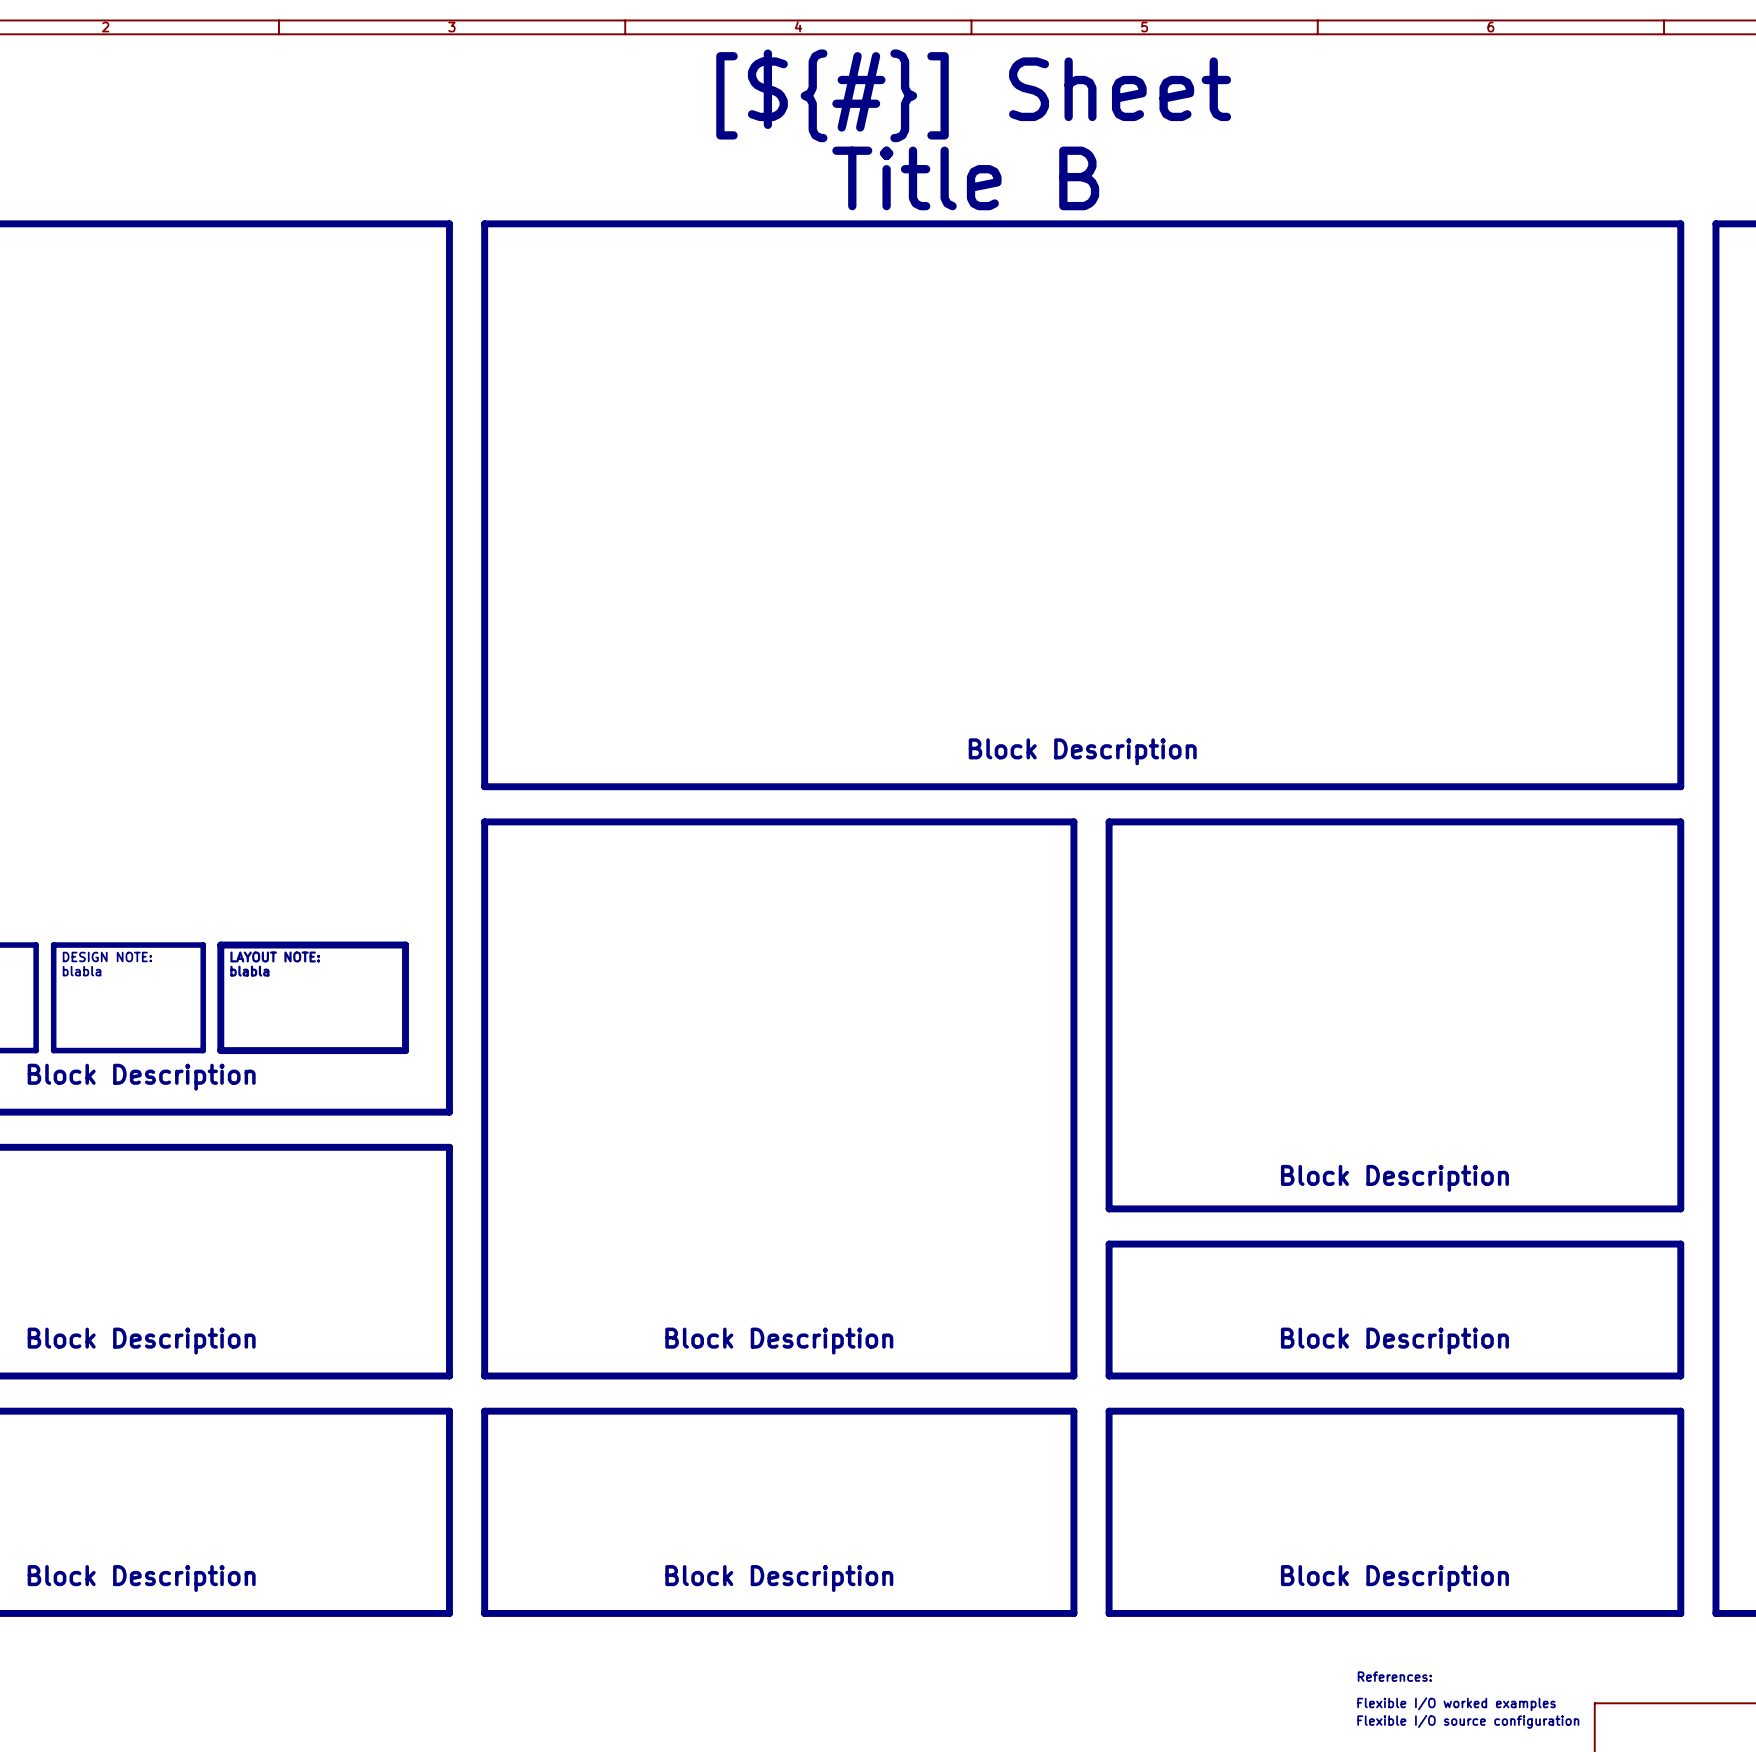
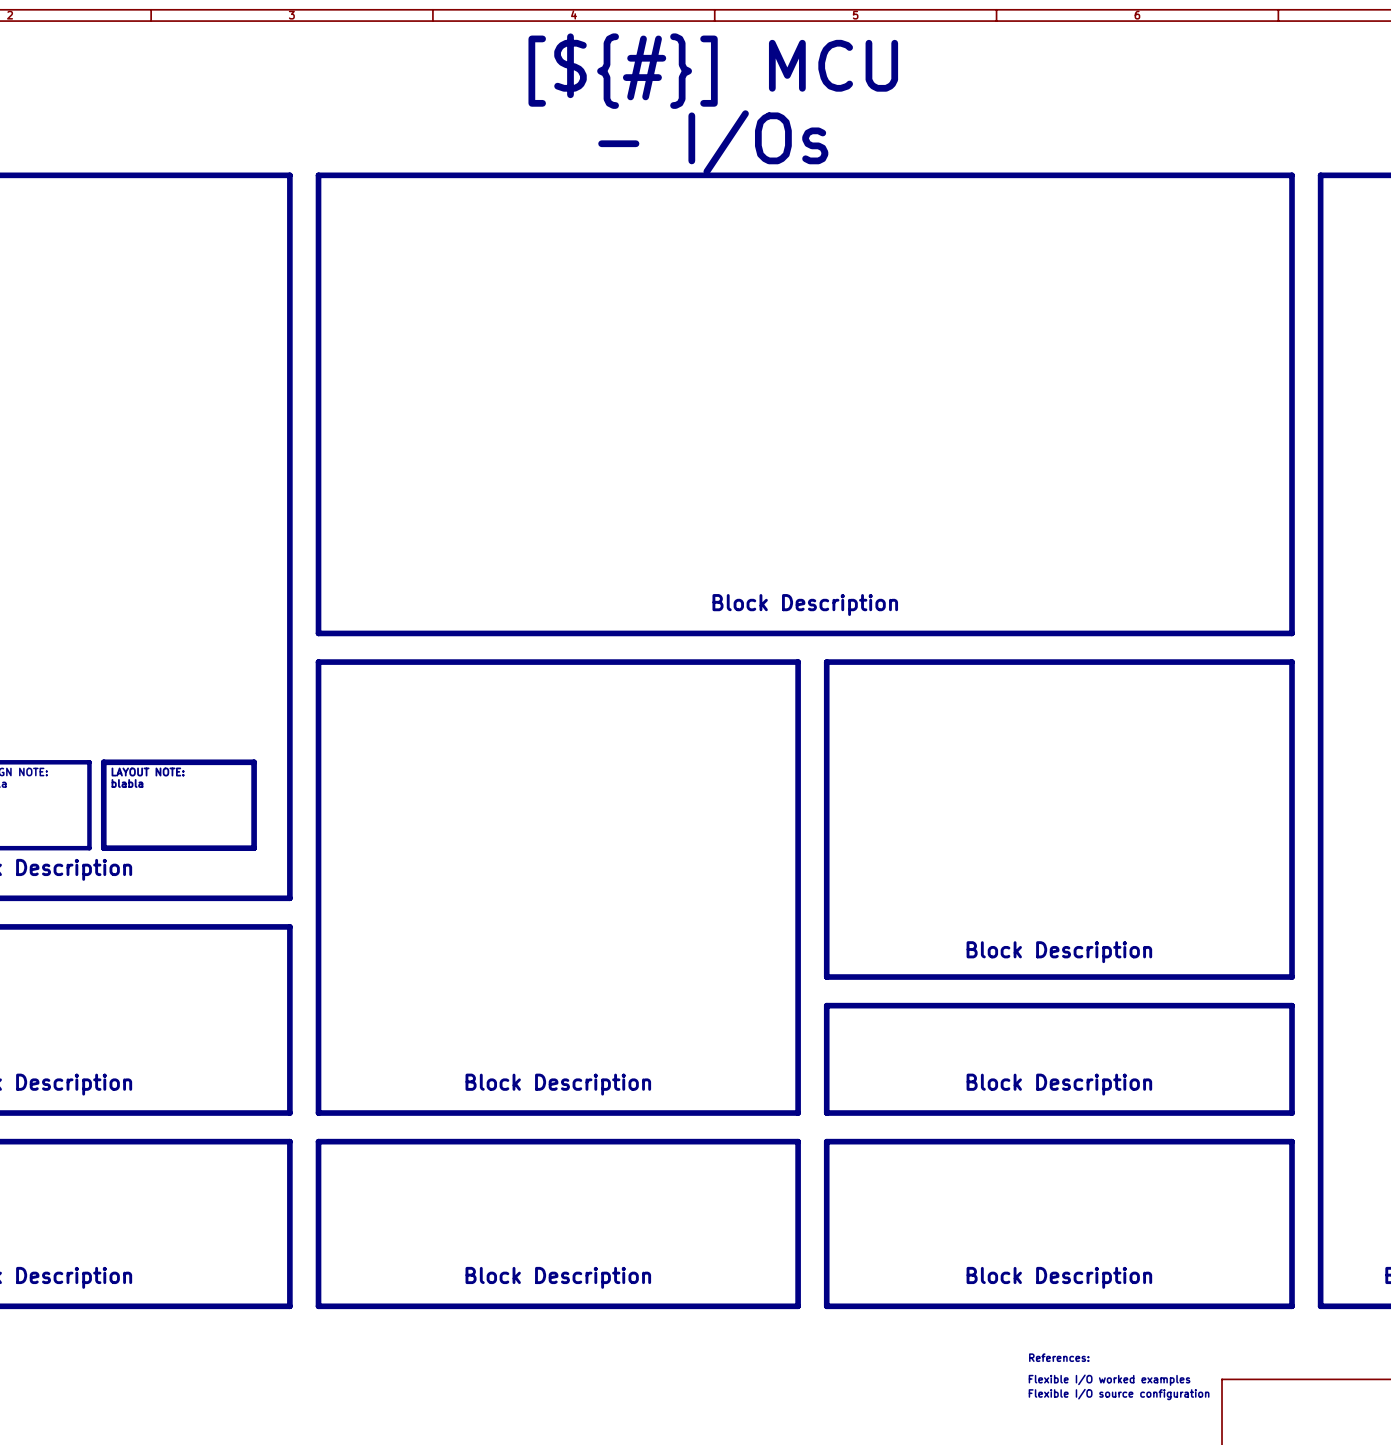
text: [${#}] Sheet (973, 95) -> [${#}] MCU (713, 71)
text: Title B (965, 178) -> - I/Os (713, 142)

